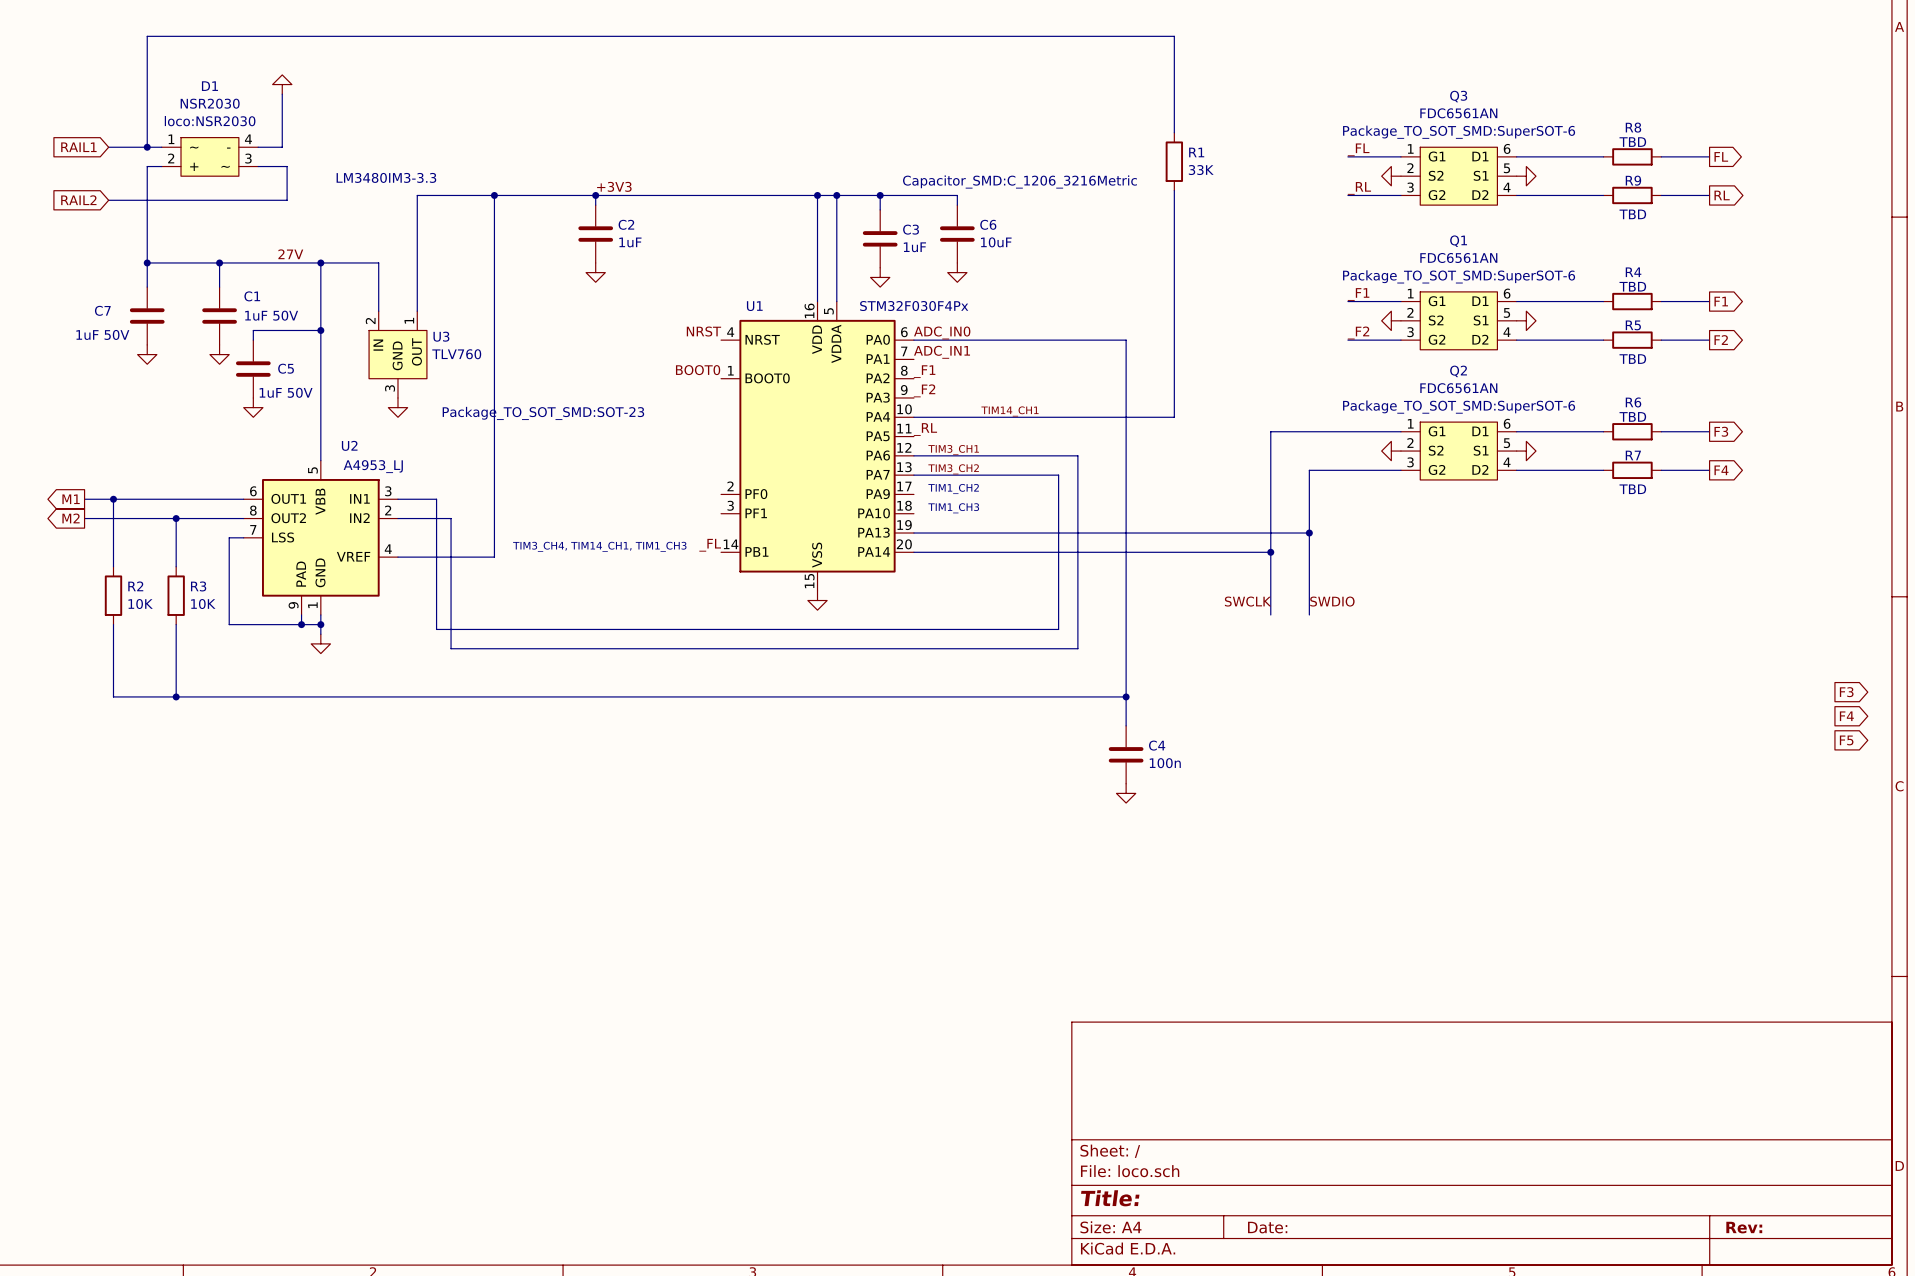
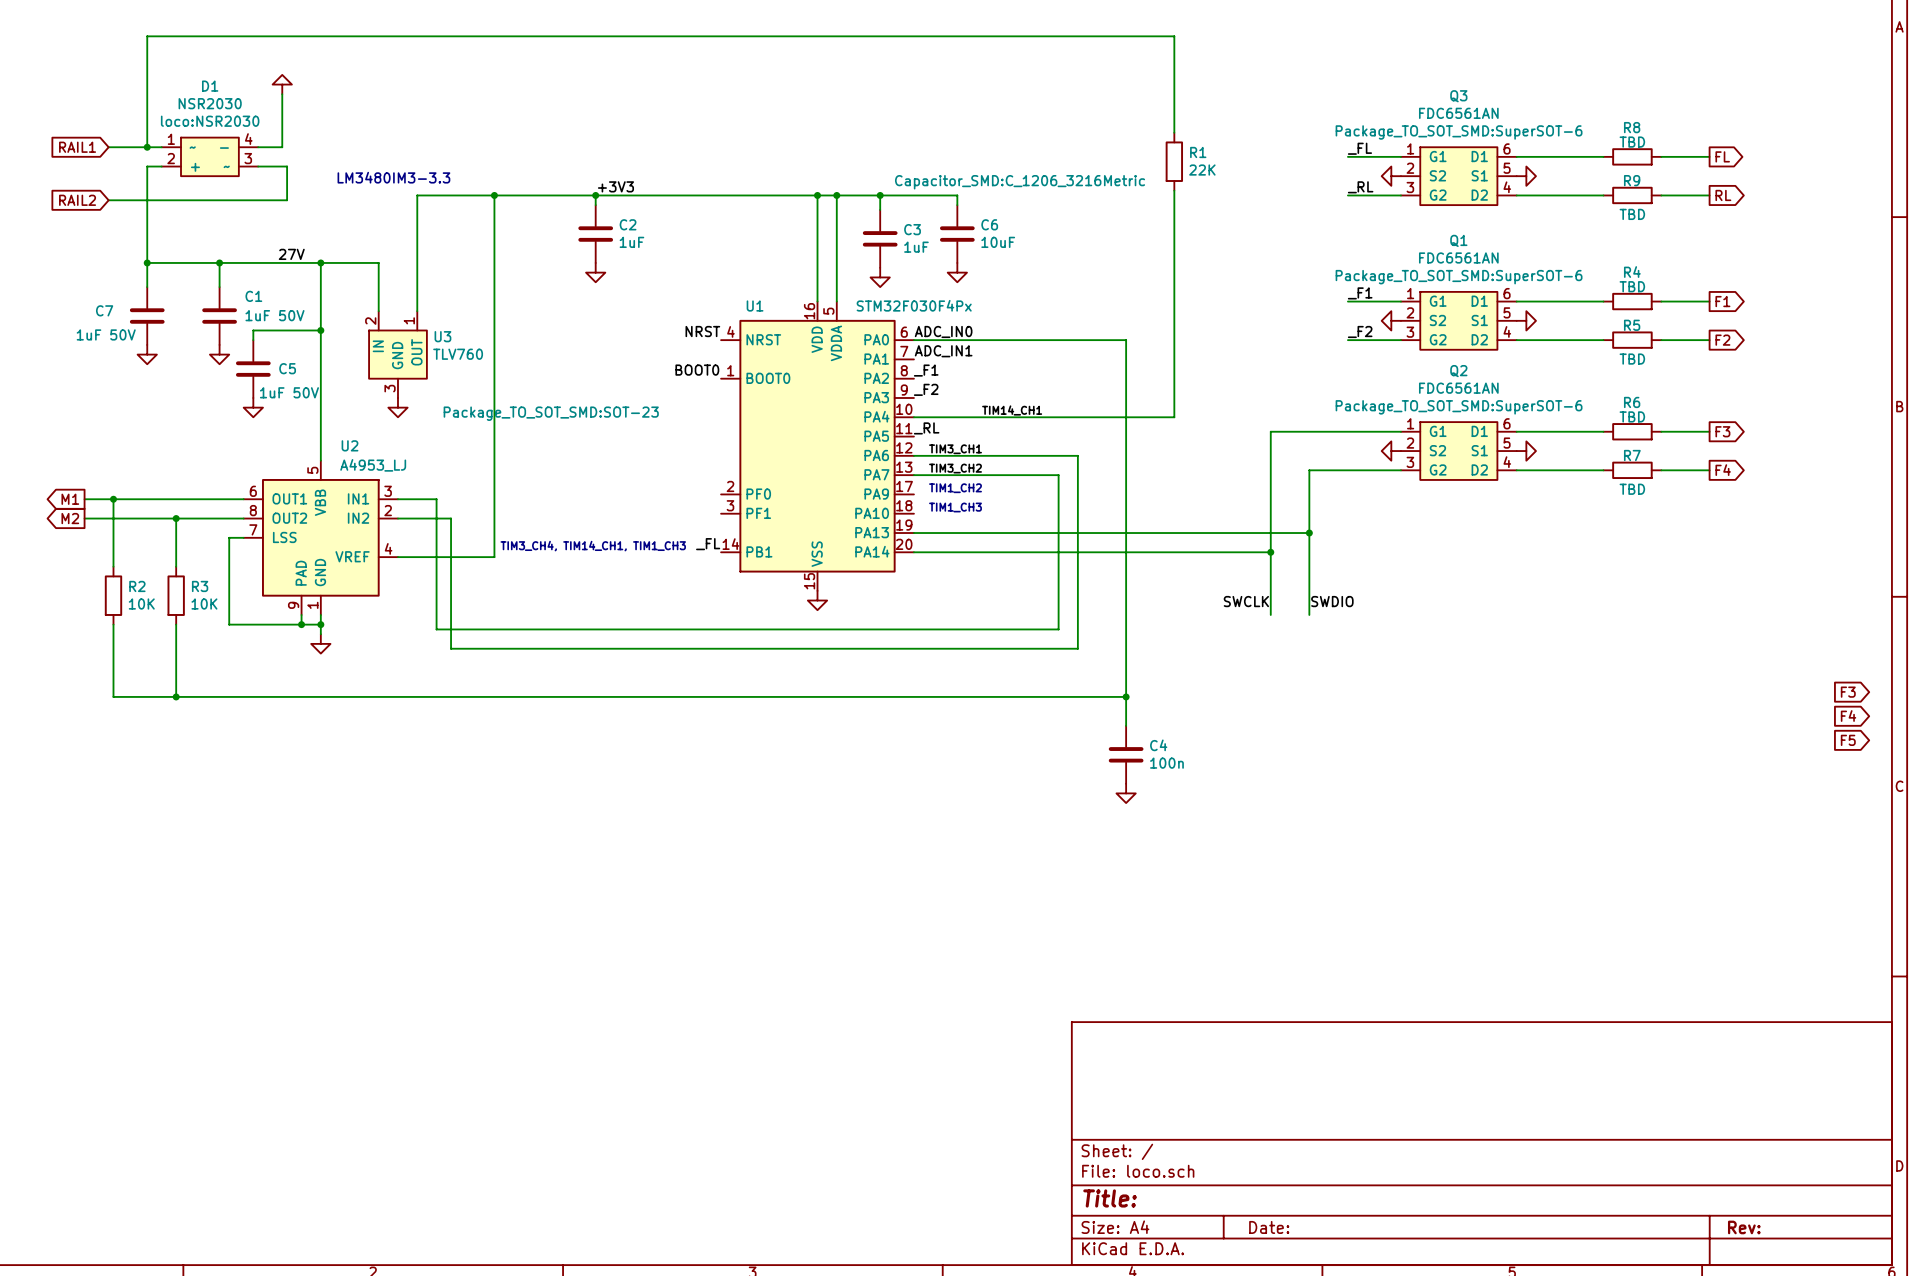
R1 value: 33K (1201, 170) -> 22K (1202, 170)

